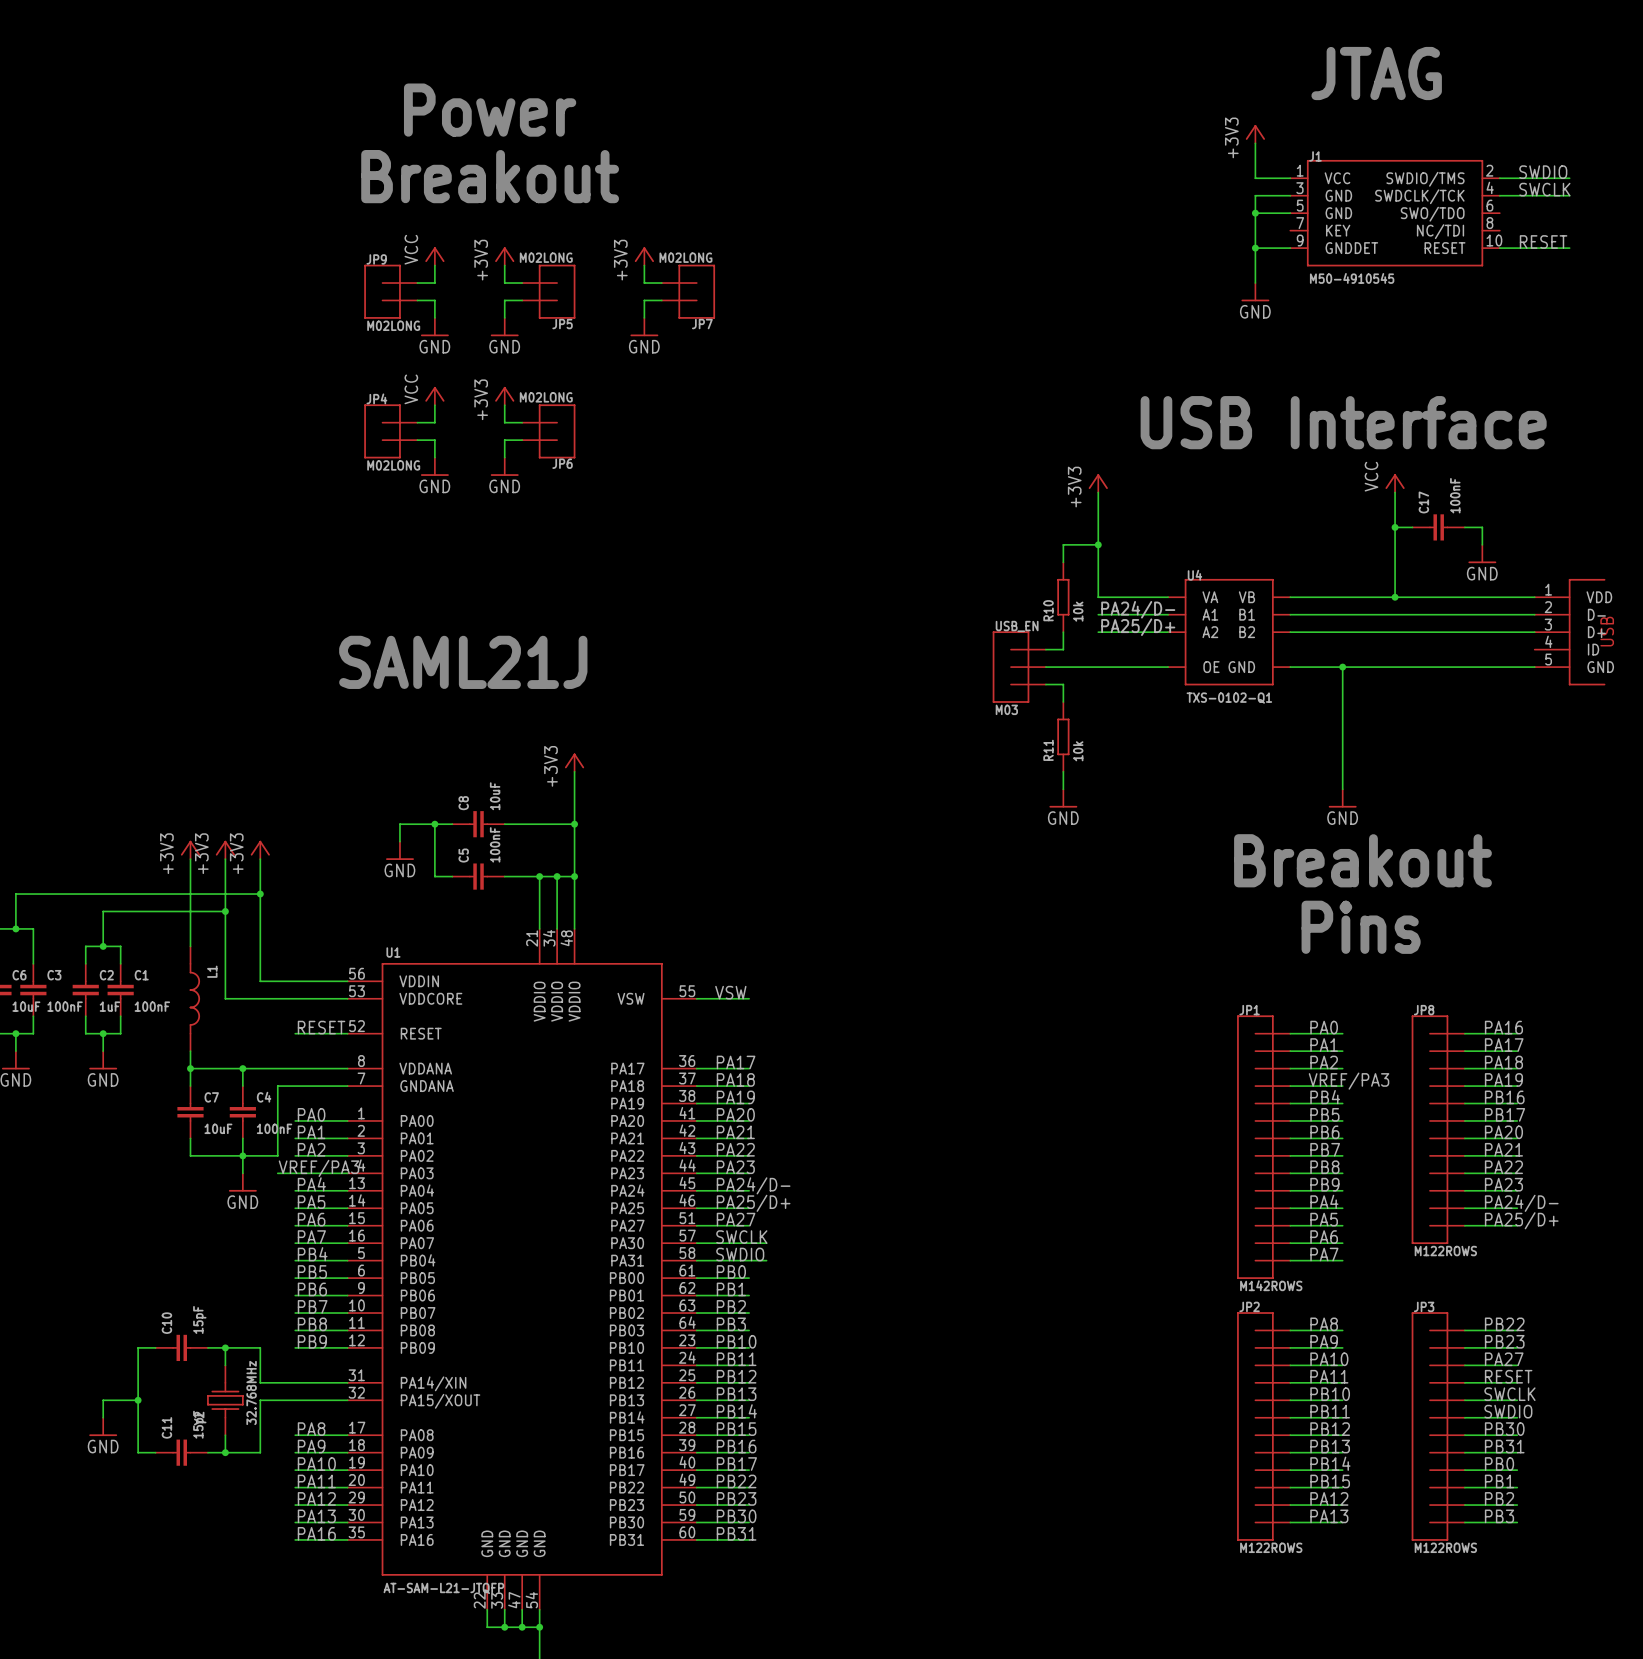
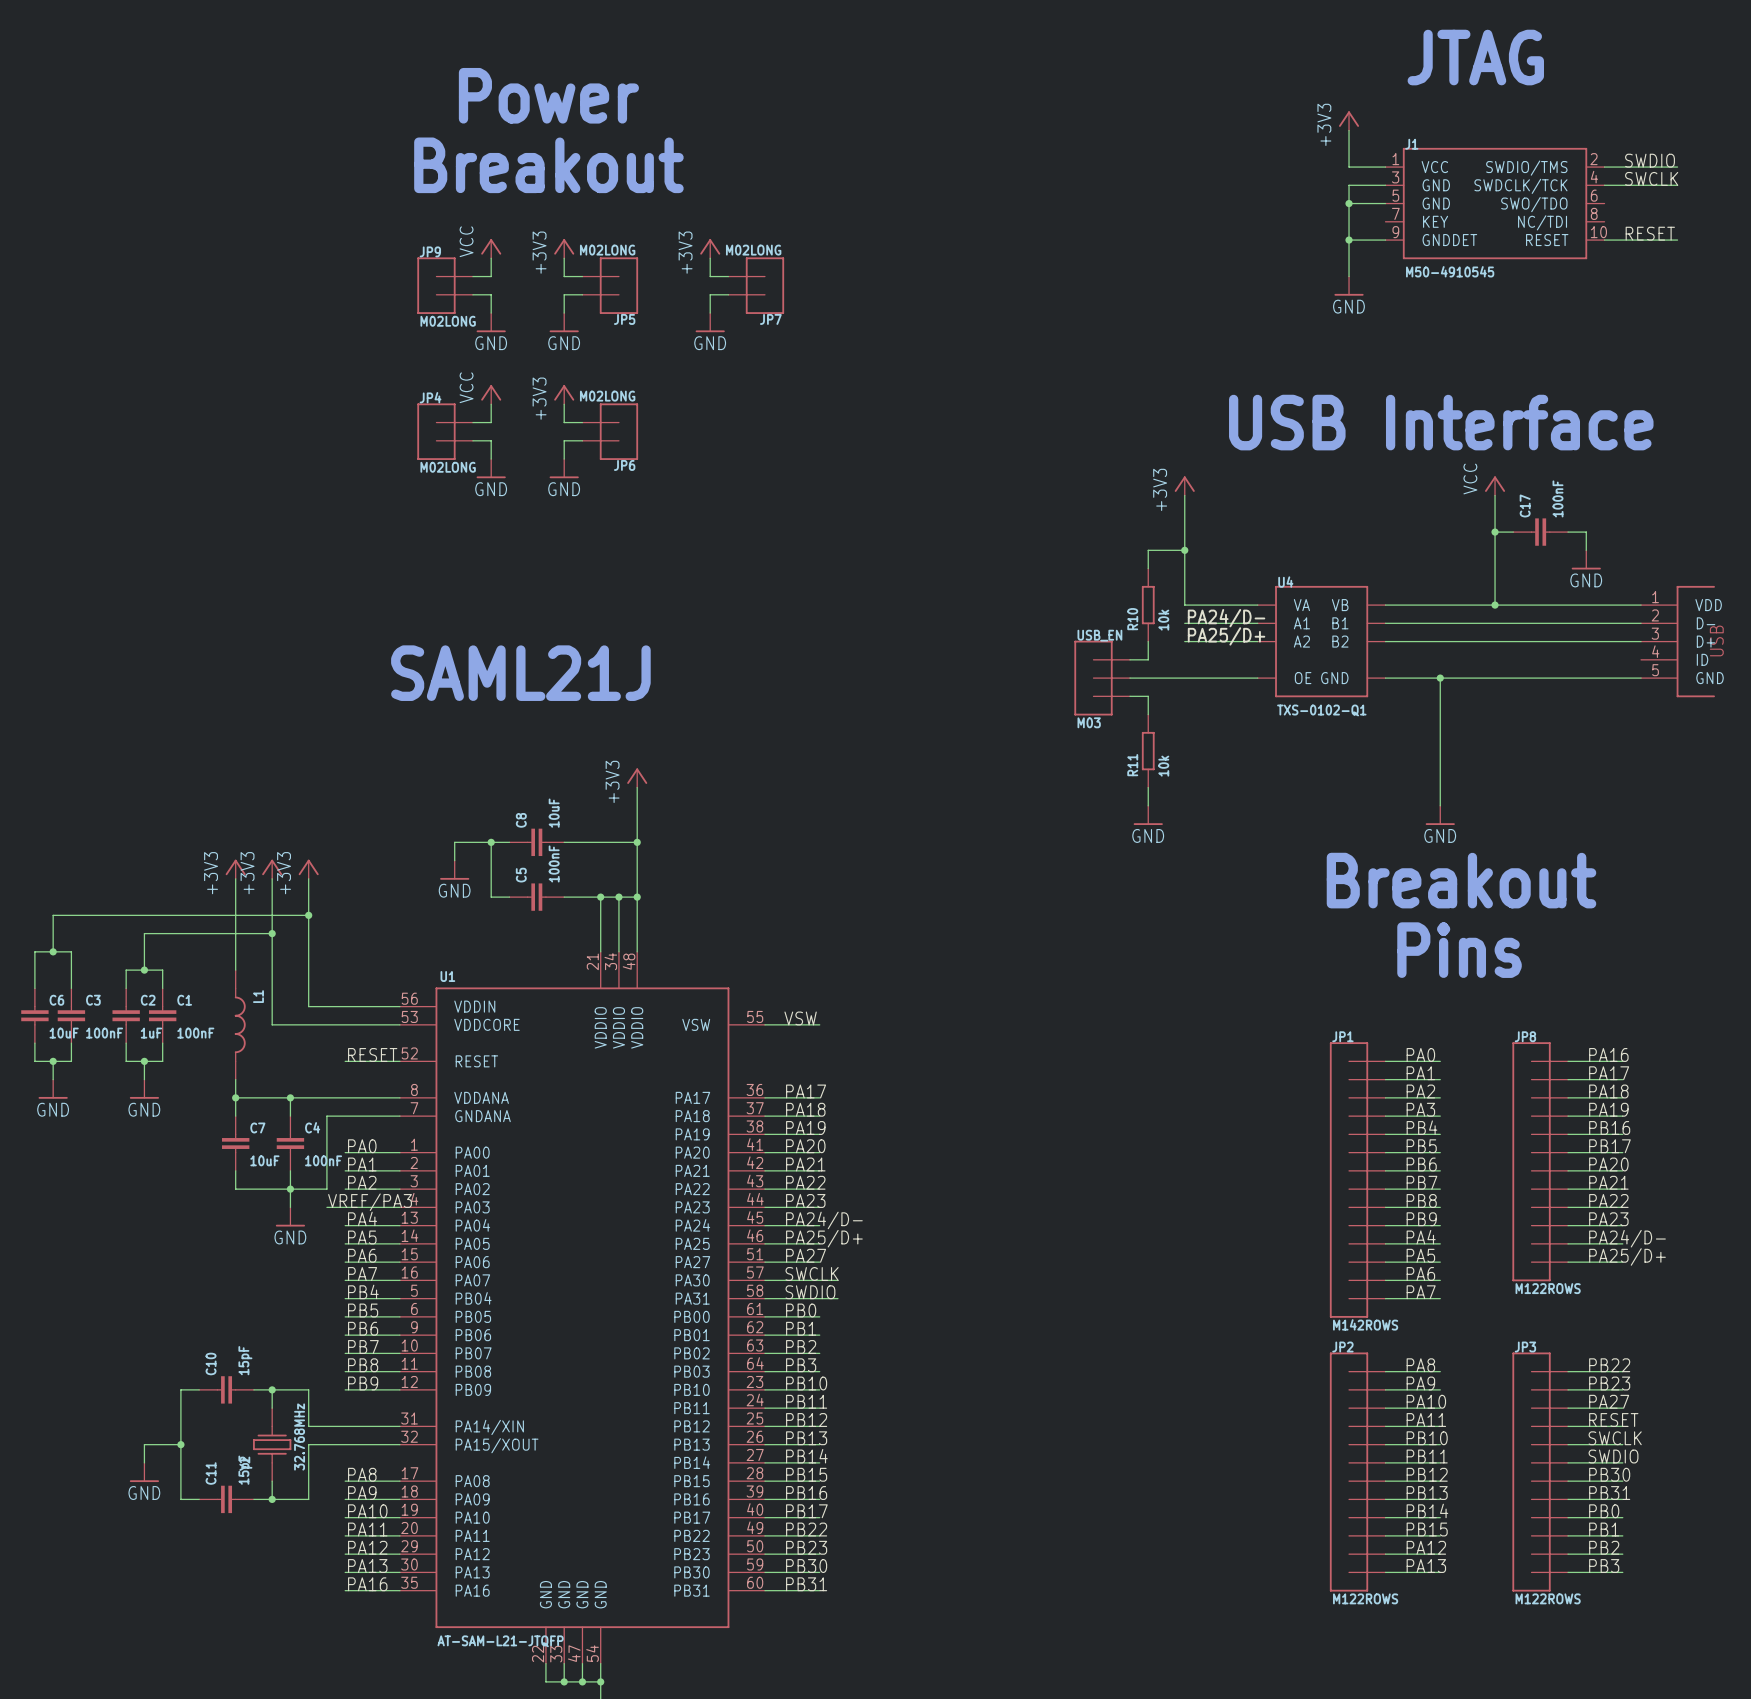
label: VREF/PA3 (1349, 1081) -> PA3 (1420, 1109)

